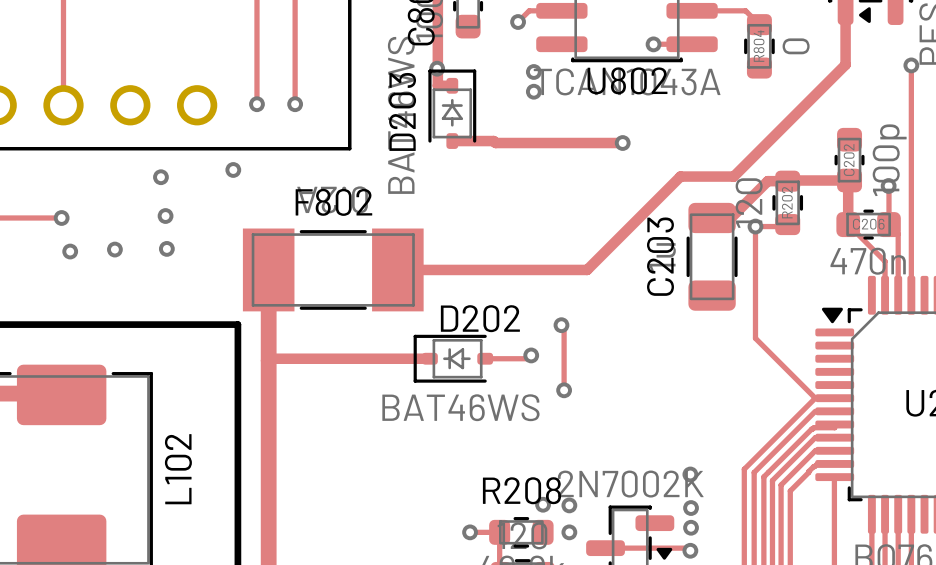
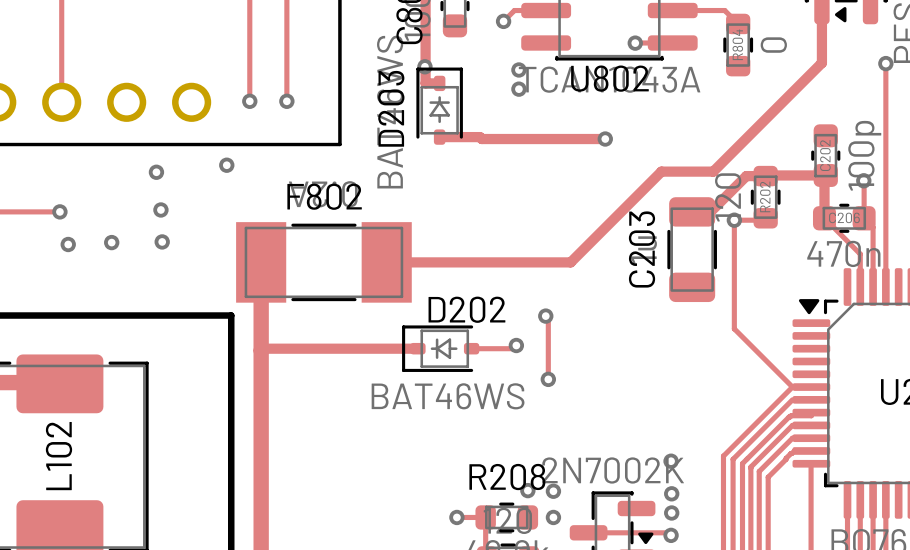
L102 name position: L102 (178, 469) -> L102 (58, 456)

